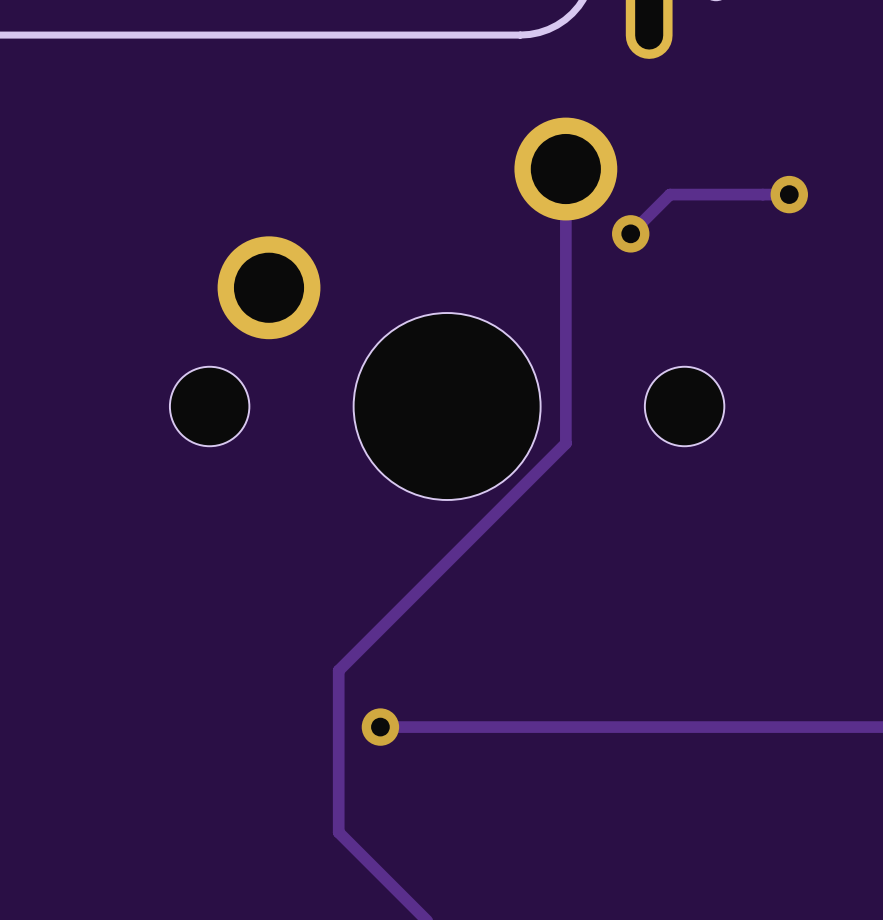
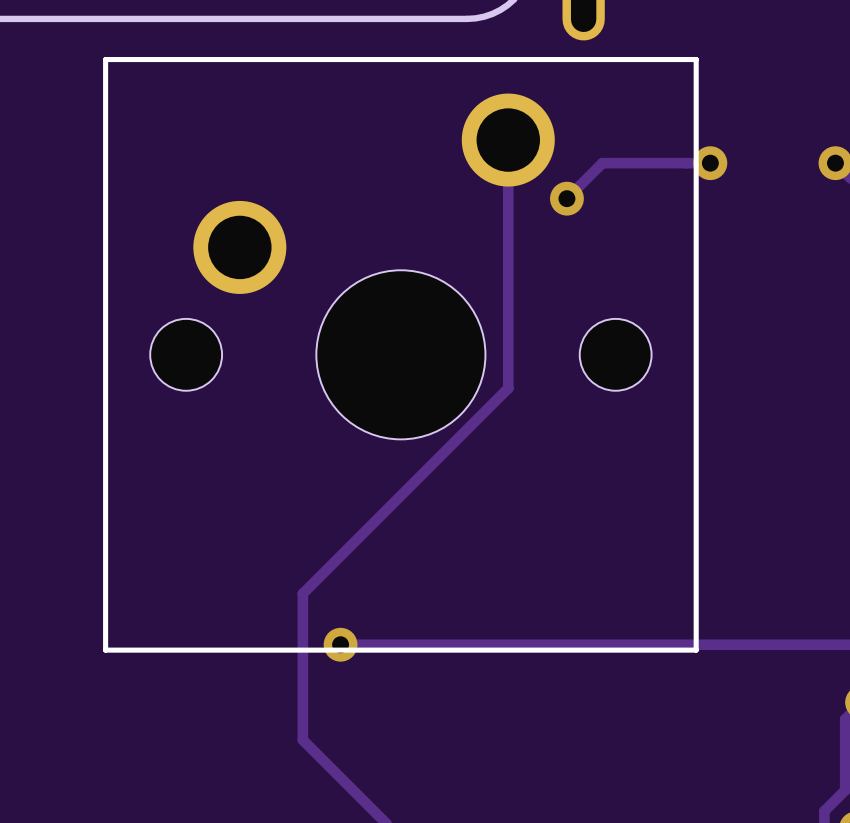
part: none -> (400, 354)

